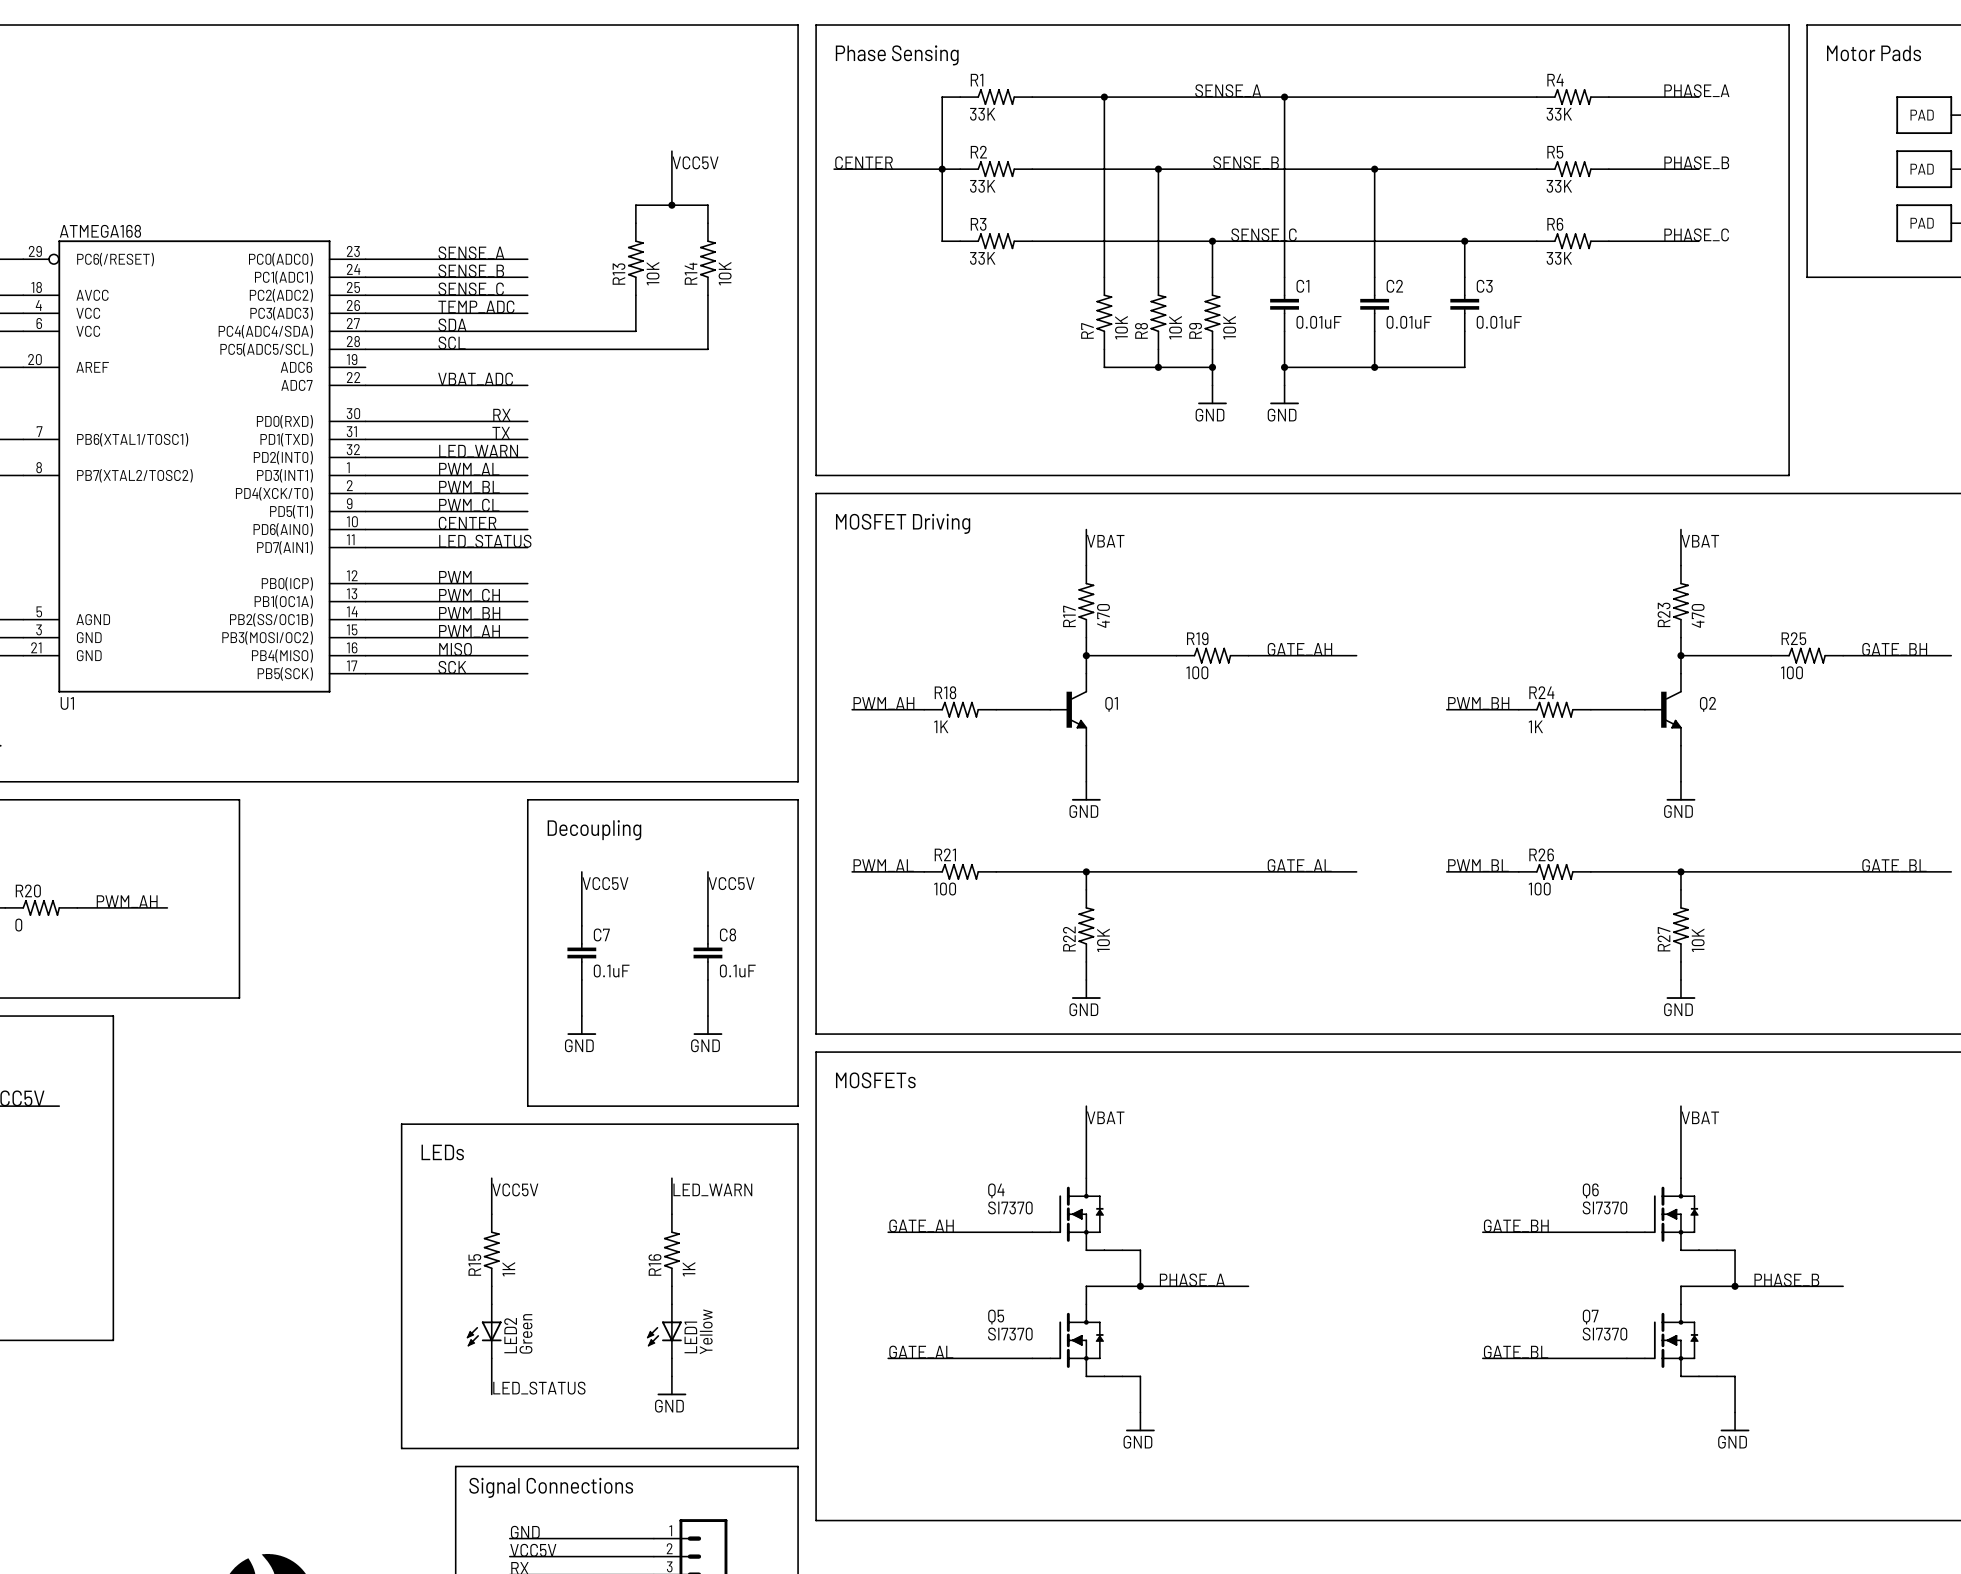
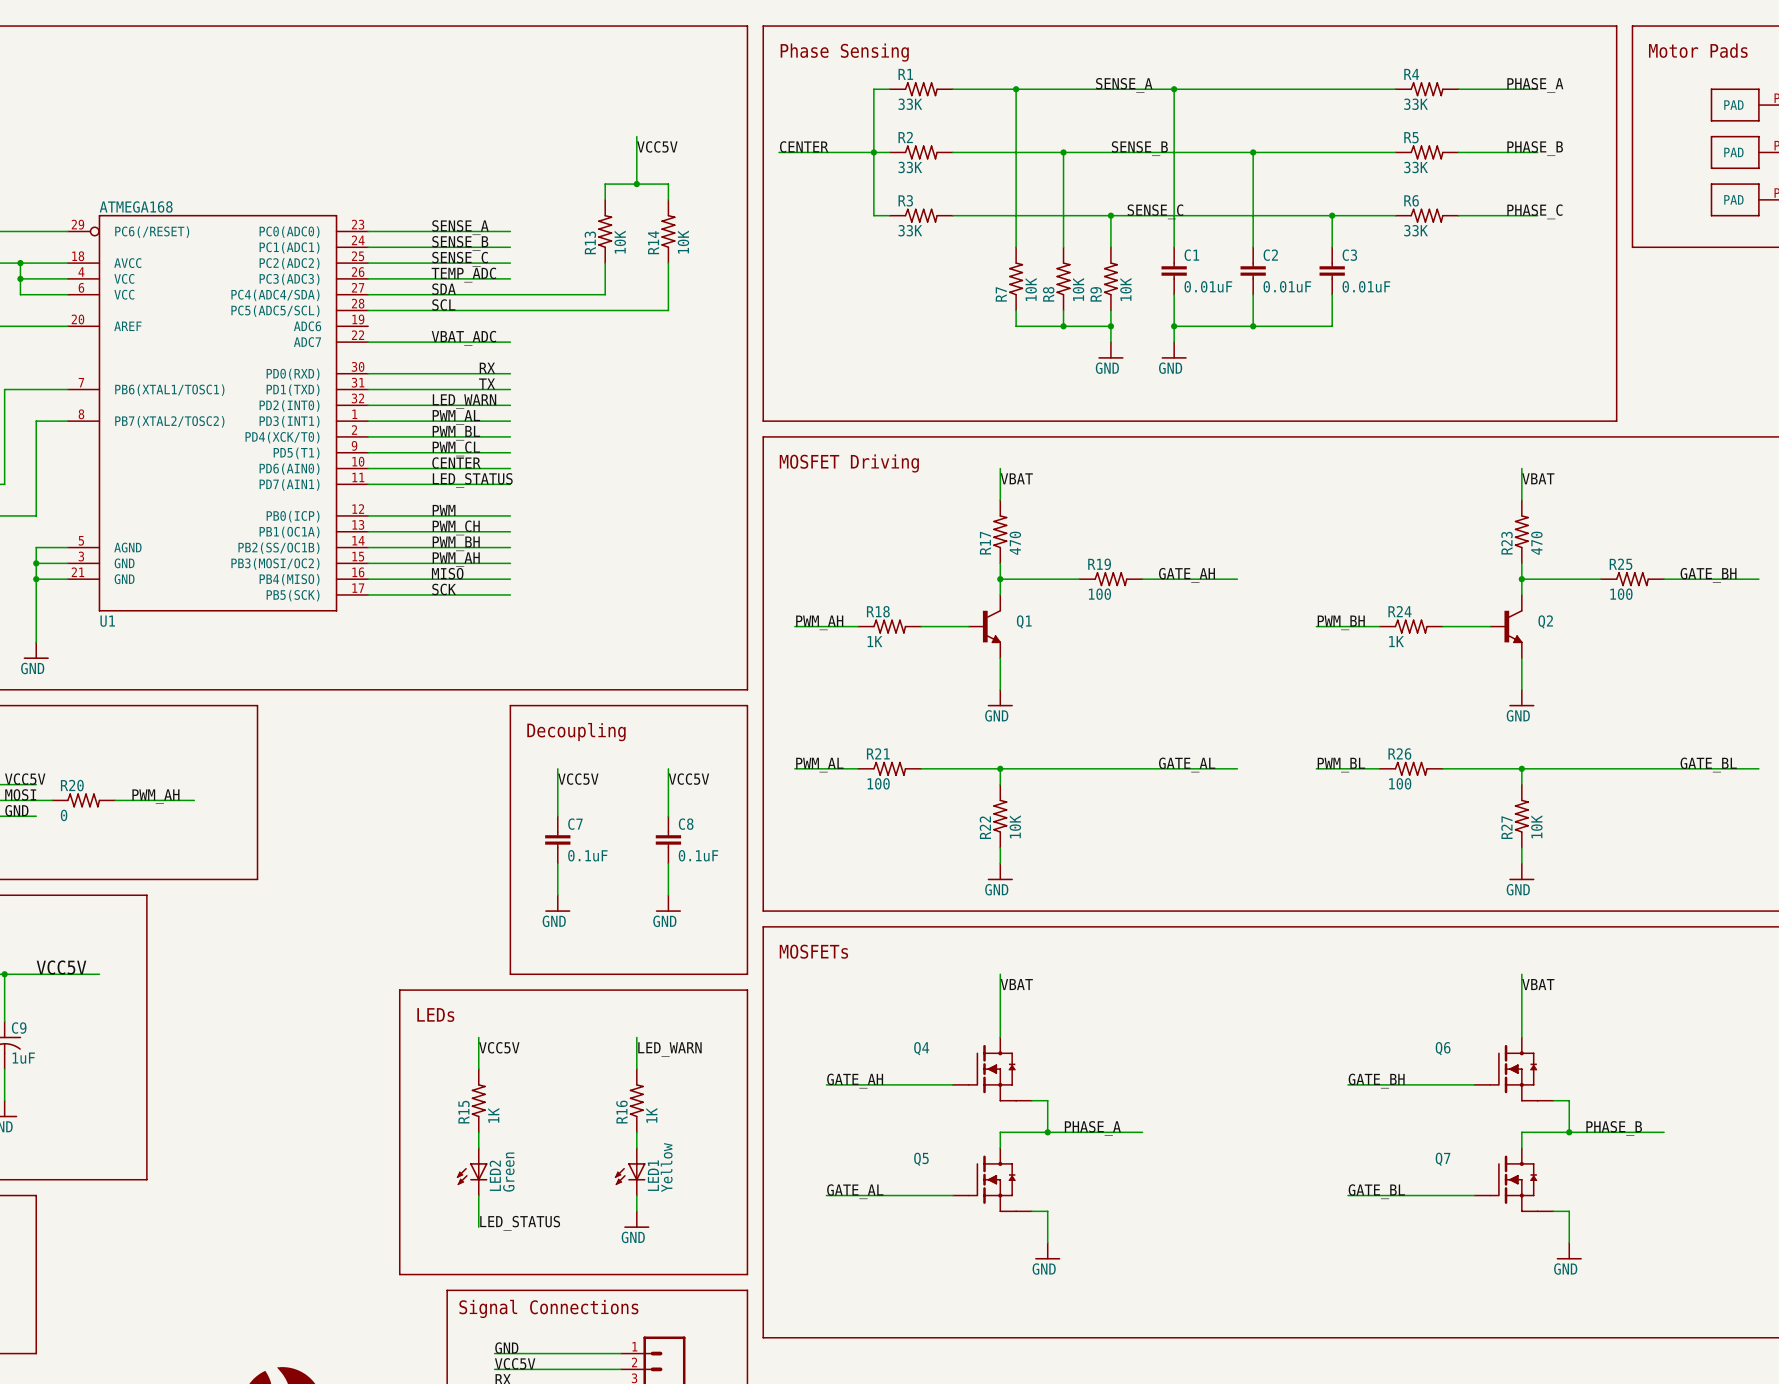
Q4 value: SI7370 (1010, 1207) -> none
Q6 value: SI7370 (1604, 1207) -> none
Q5 value: SI7370 (1010, 1334) -> none
Q7 value: SI7370 (1604, 1334) -> none

